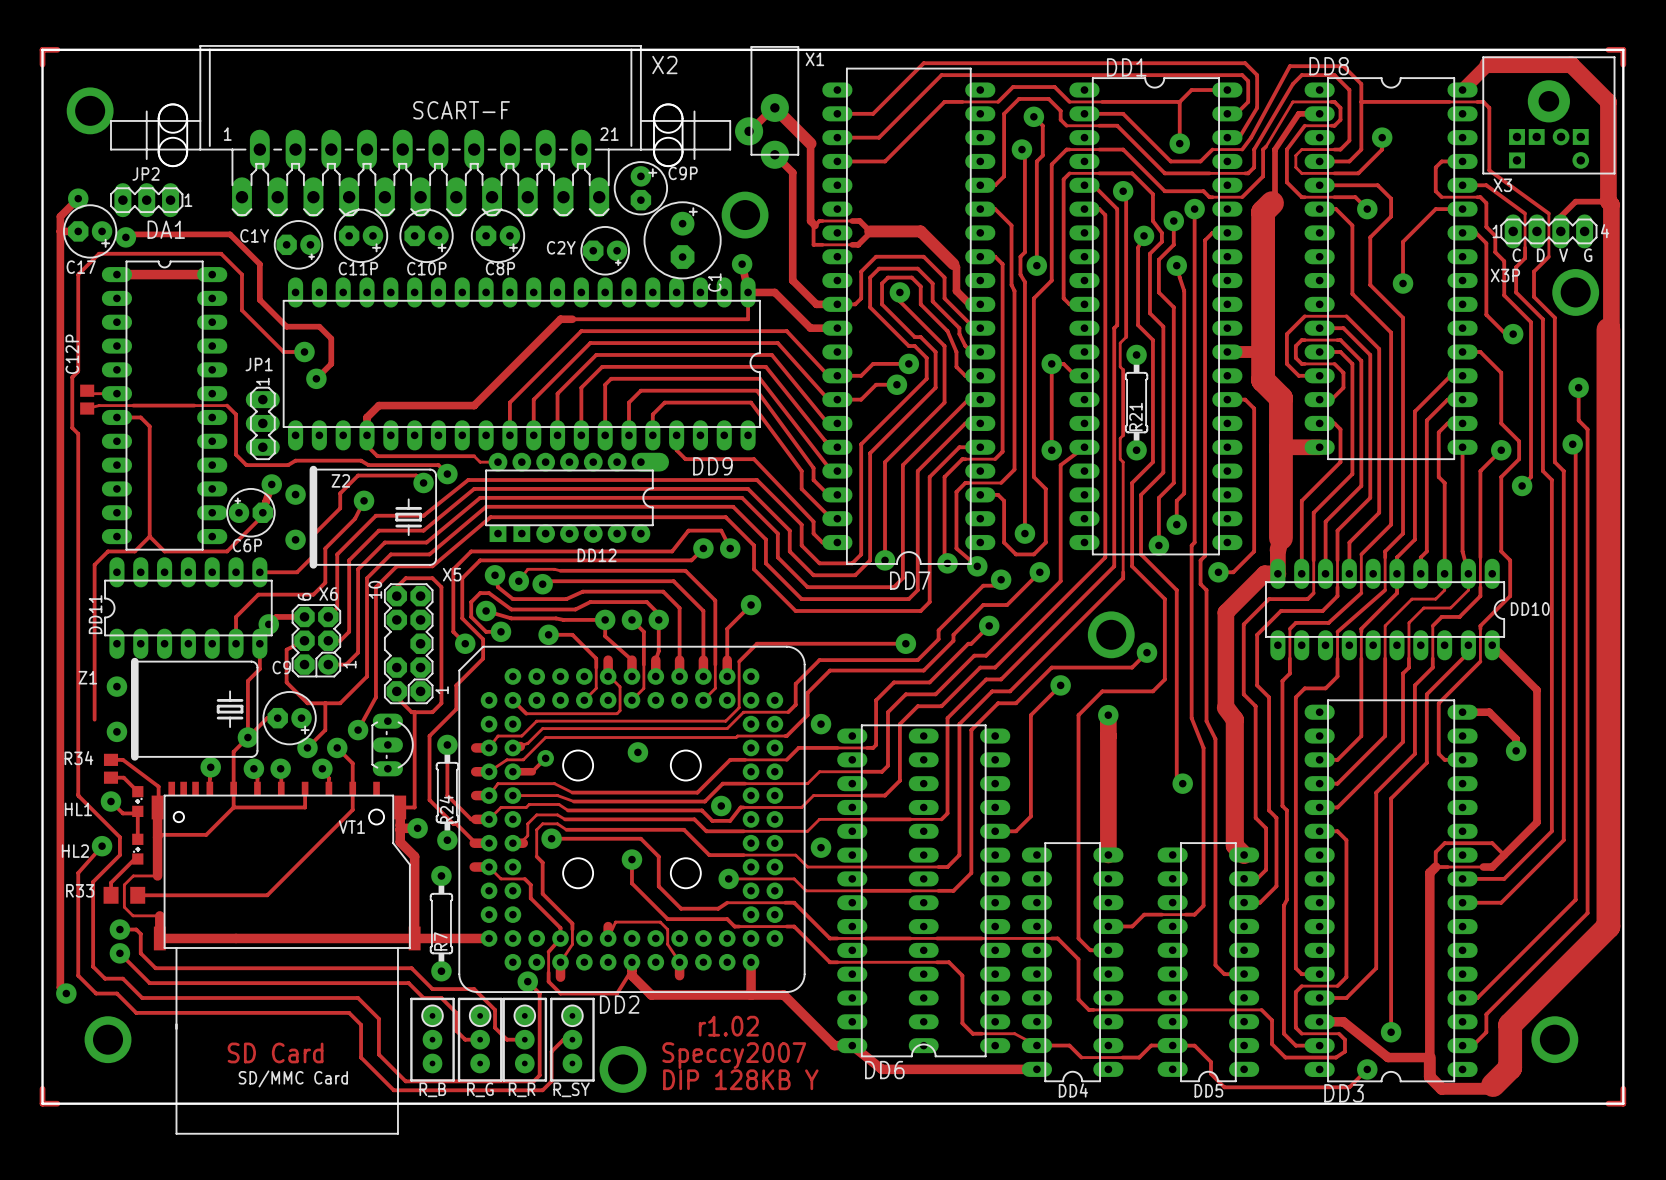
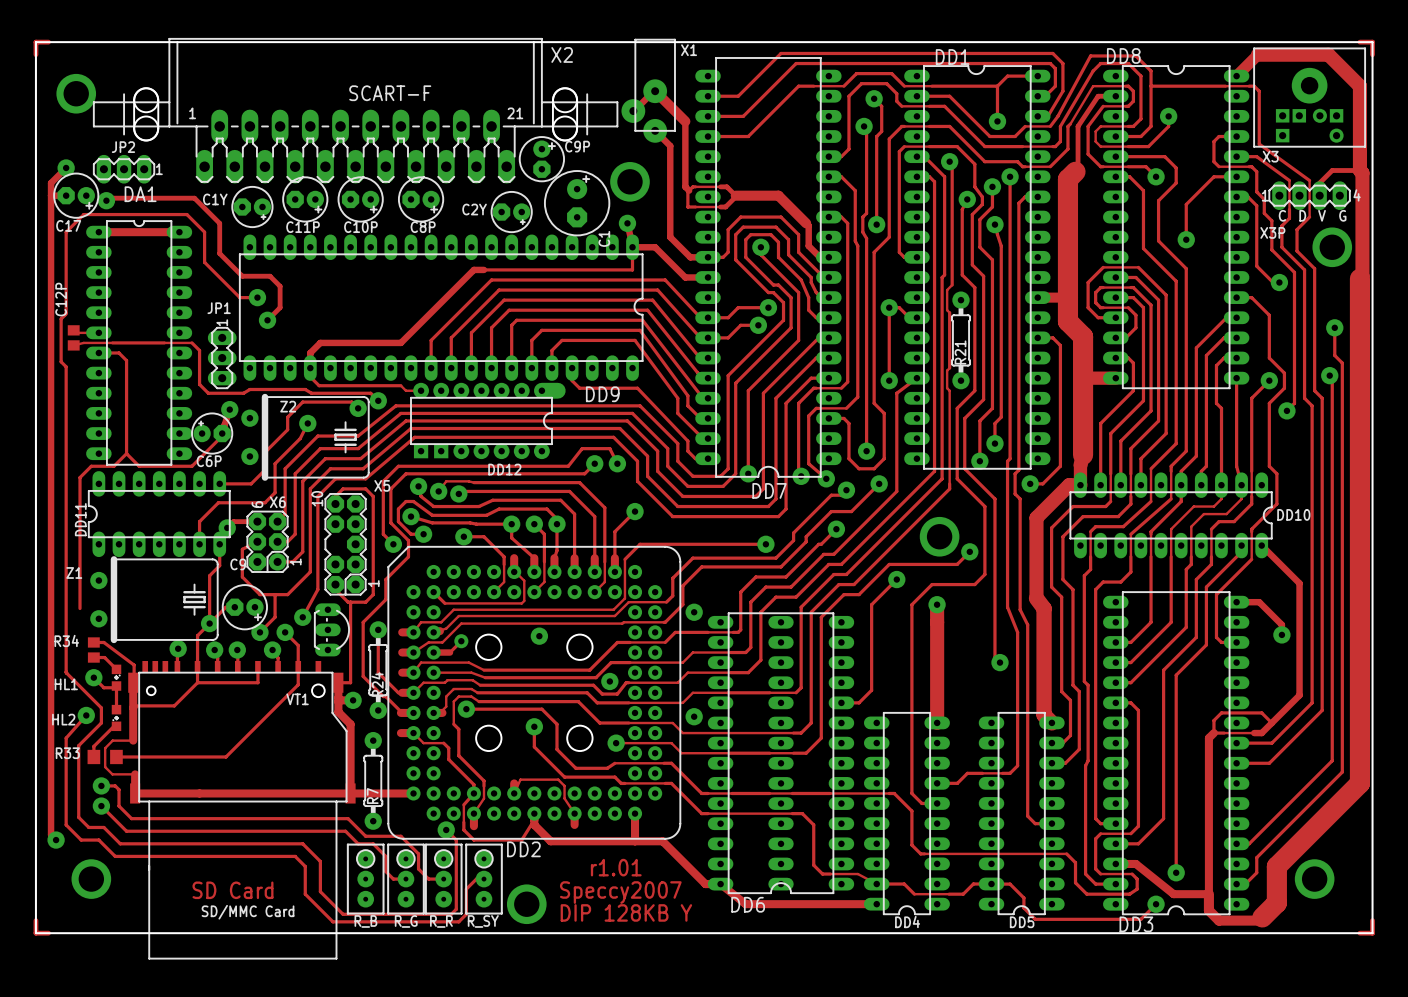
text: r1.02 (728, 1026) -> r1.01 (616, 867)

